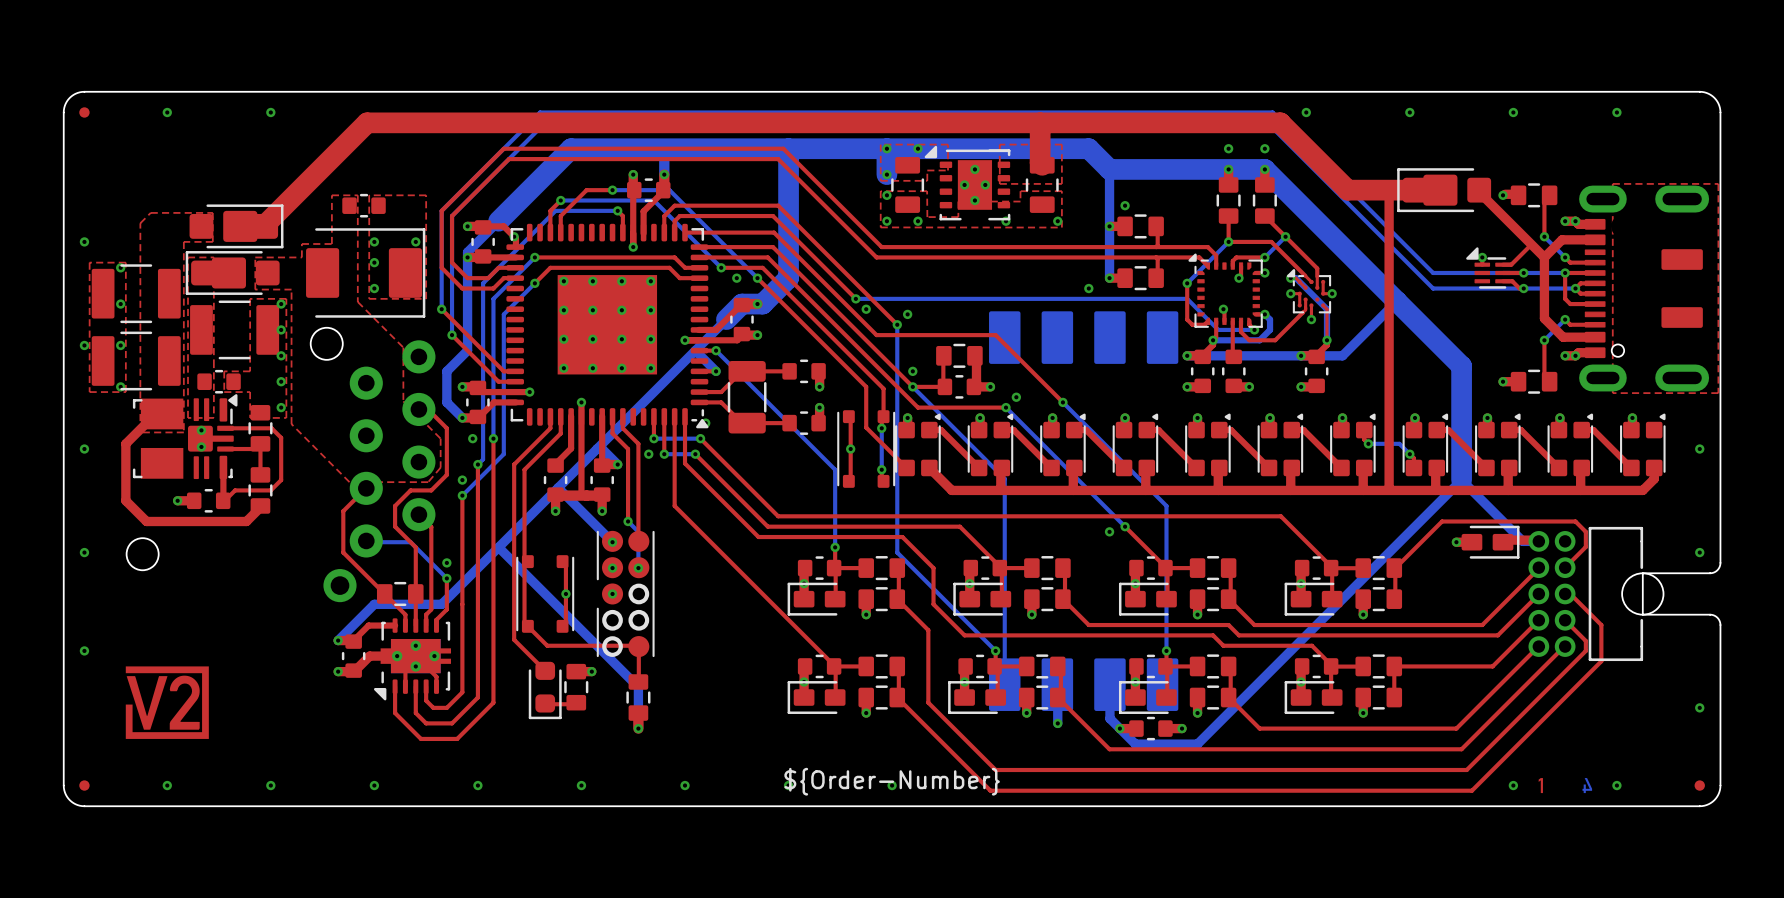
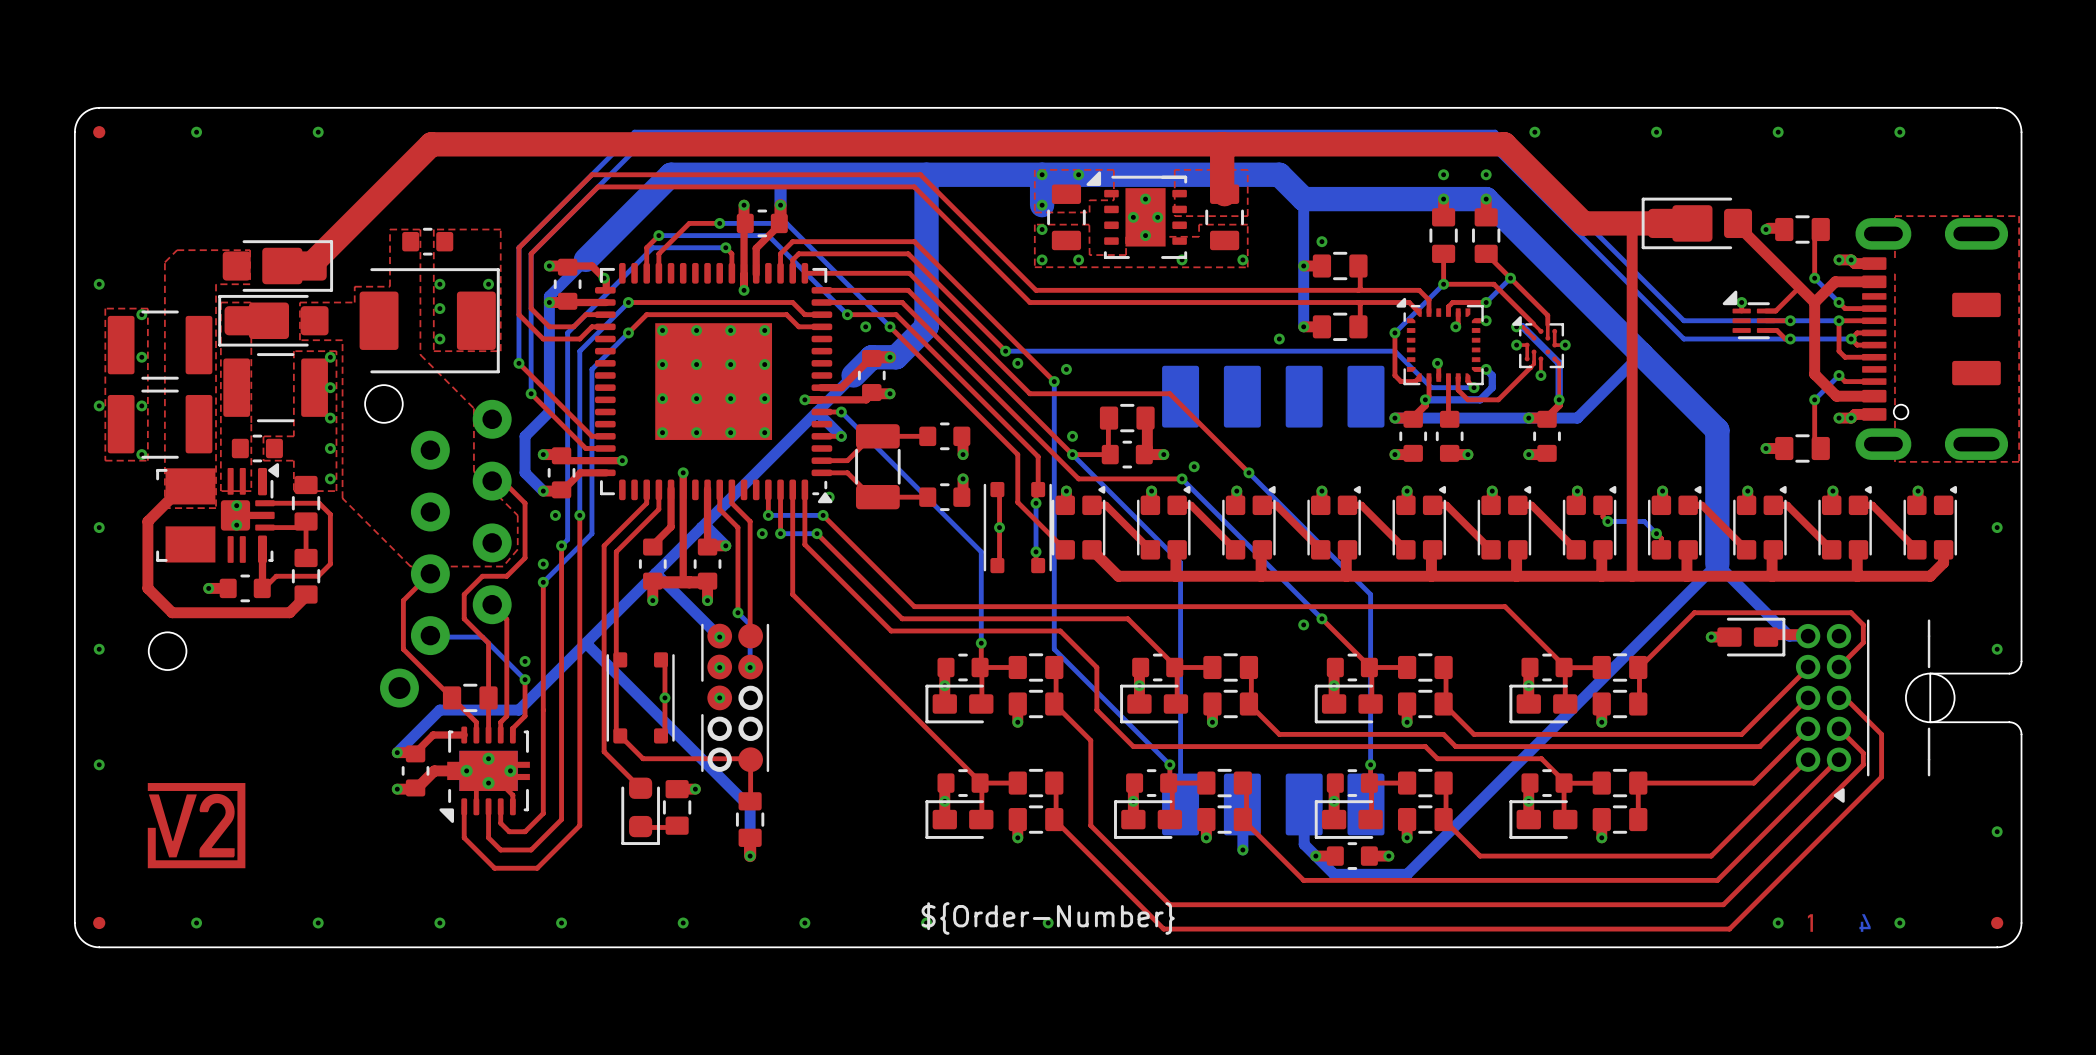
part footprint: [1528, 526, 1644, 662] -> [1795, 619, 1931, 803]

